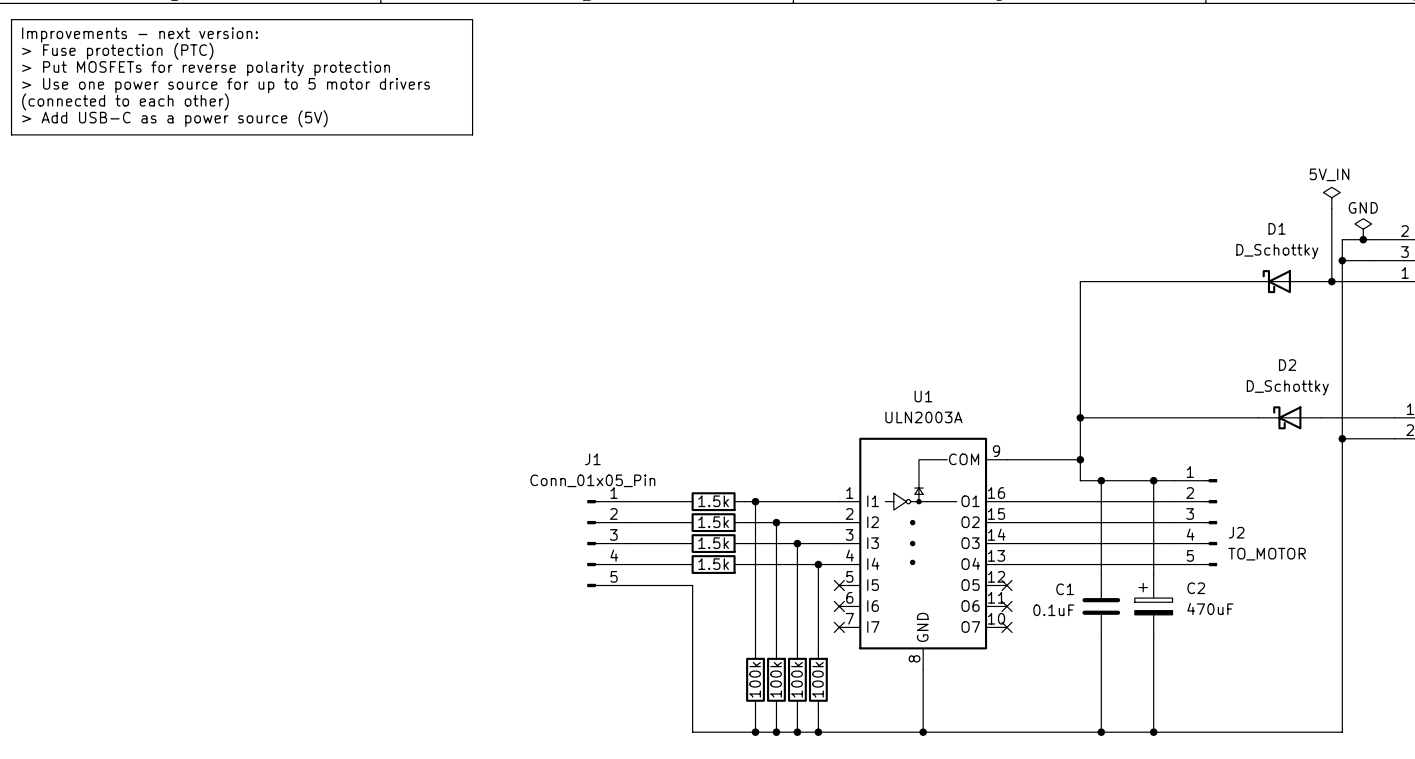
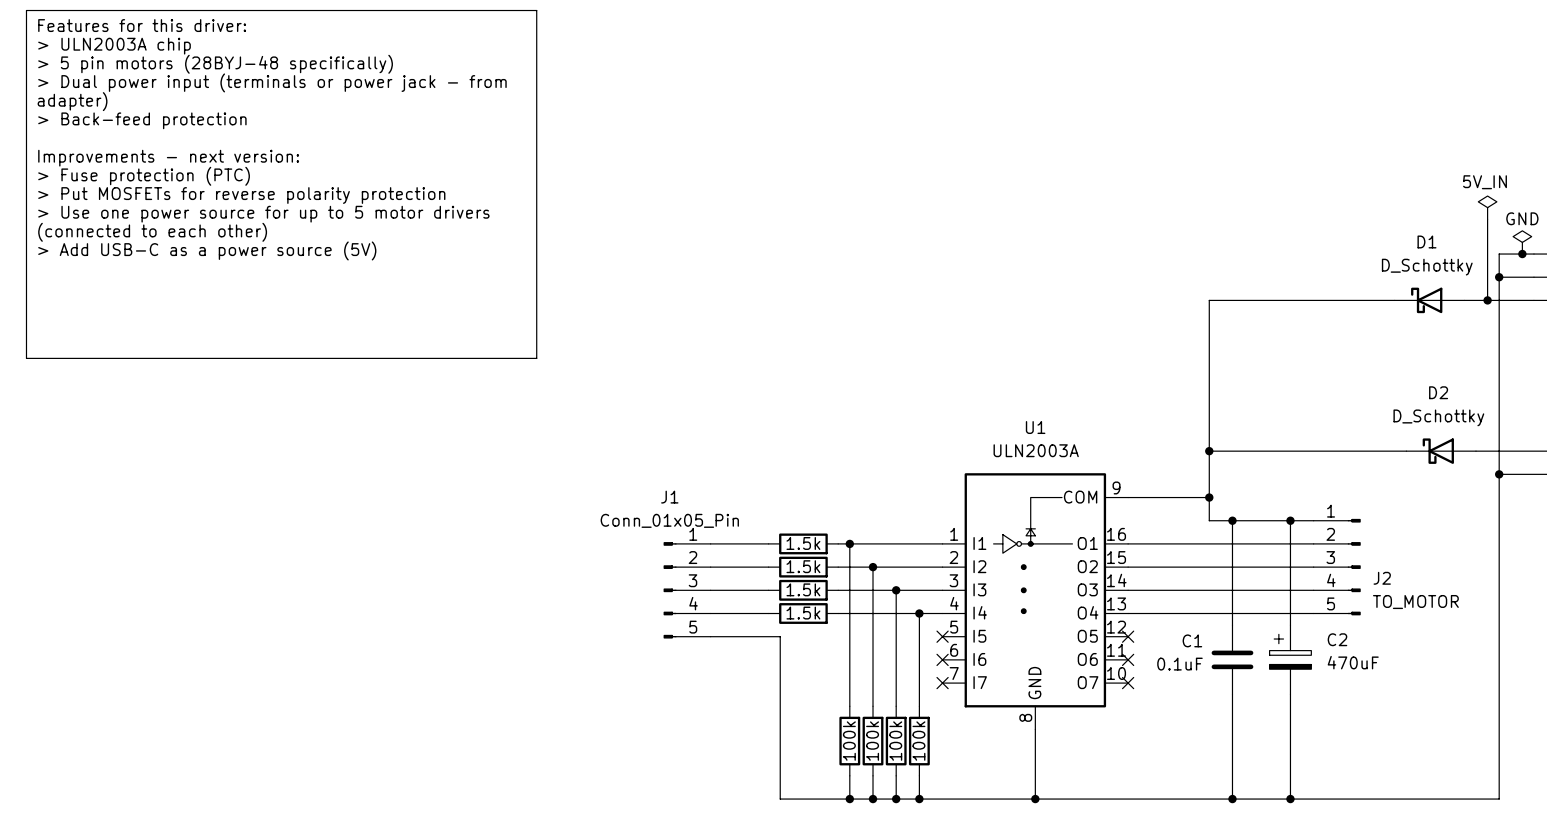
text: Improvements - next version: (139, 34) -> Features for this driver: (142, 25)
text: > Fuse protection (PTC) (117, 51) -> > ULN2003A chip (114, 46)
text: > Put MOSFETs for reverse polarity protection (206, 68) -> > 5 pin motors (28BYJ-48 specifically) (215, 64)
text: > Use one power source for up to 5 motor drivers (226, 85) -> > Dual power input (terminals or power jack - from (272, 82)
text: (connected to each other) (125, 101) -> adapter) (72, 101)
text: > Add USB-C as a power source (5V) (174, 118) -> > Back-feed protection (142, 120)
line: (11, 134) (472, 134) -> (26, 138) (26, 358) (536, 358) (536, 138)
text: none -> Improvements - next version: (168, 158)
text: none -> > Fuse protection (PTC) (144, 176)
text: none -> > Put MOSFETs for reverse polarity protection (241, 195)
text: none -> > Use one power source for up to 5 motor drivers (263, 214)
text: none -> (connected to each other) (152, 232)
text: none -> > Add USB-C as a power source (5V) (207, 250)

